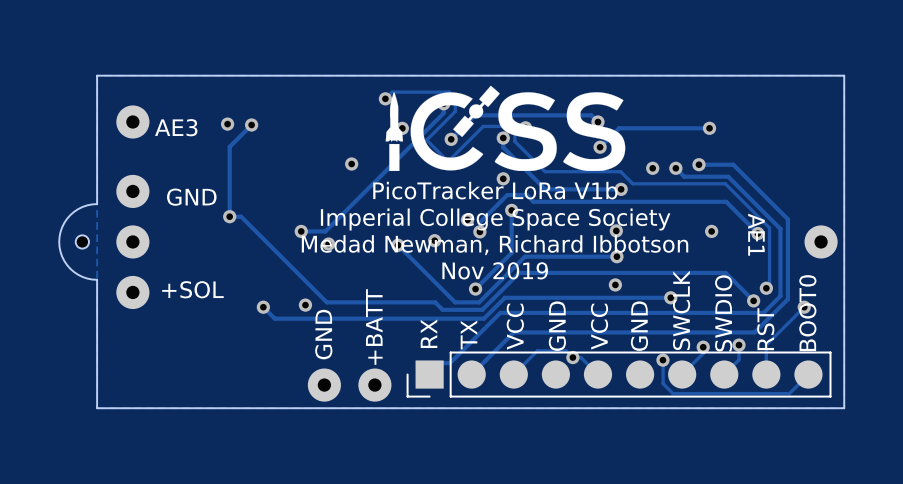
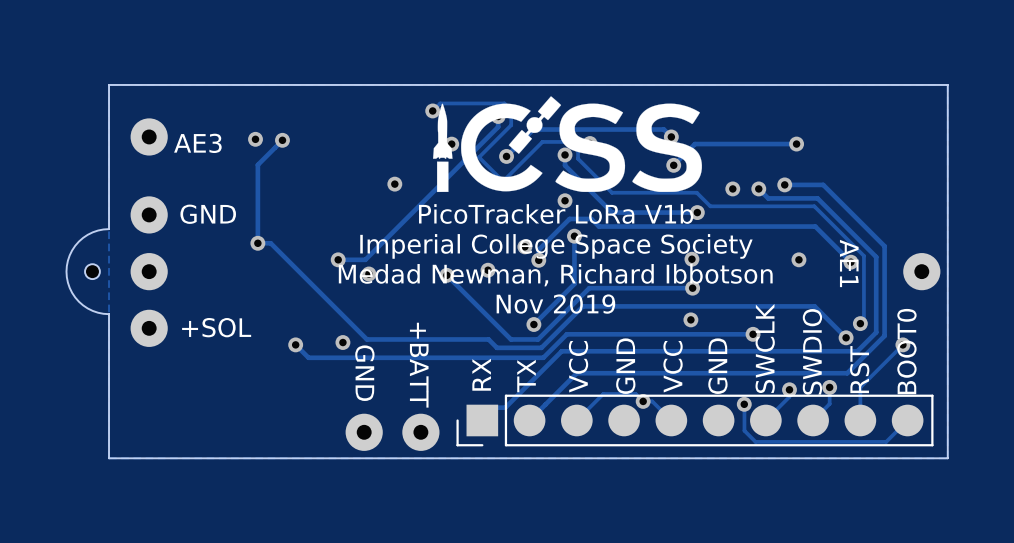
GND name: none -> GND (208, 214)
text: GND (191, 197) -> none
text: +SOL (192, 289) -> none
+SOL name: none -> +SOL (216, 327)
+BATT name: none -> +BATT (419, 365)
text: +BATT (374, 327) -> none
GND name: none -> GND (364, 373)
text: GND (323, 334) -> none

